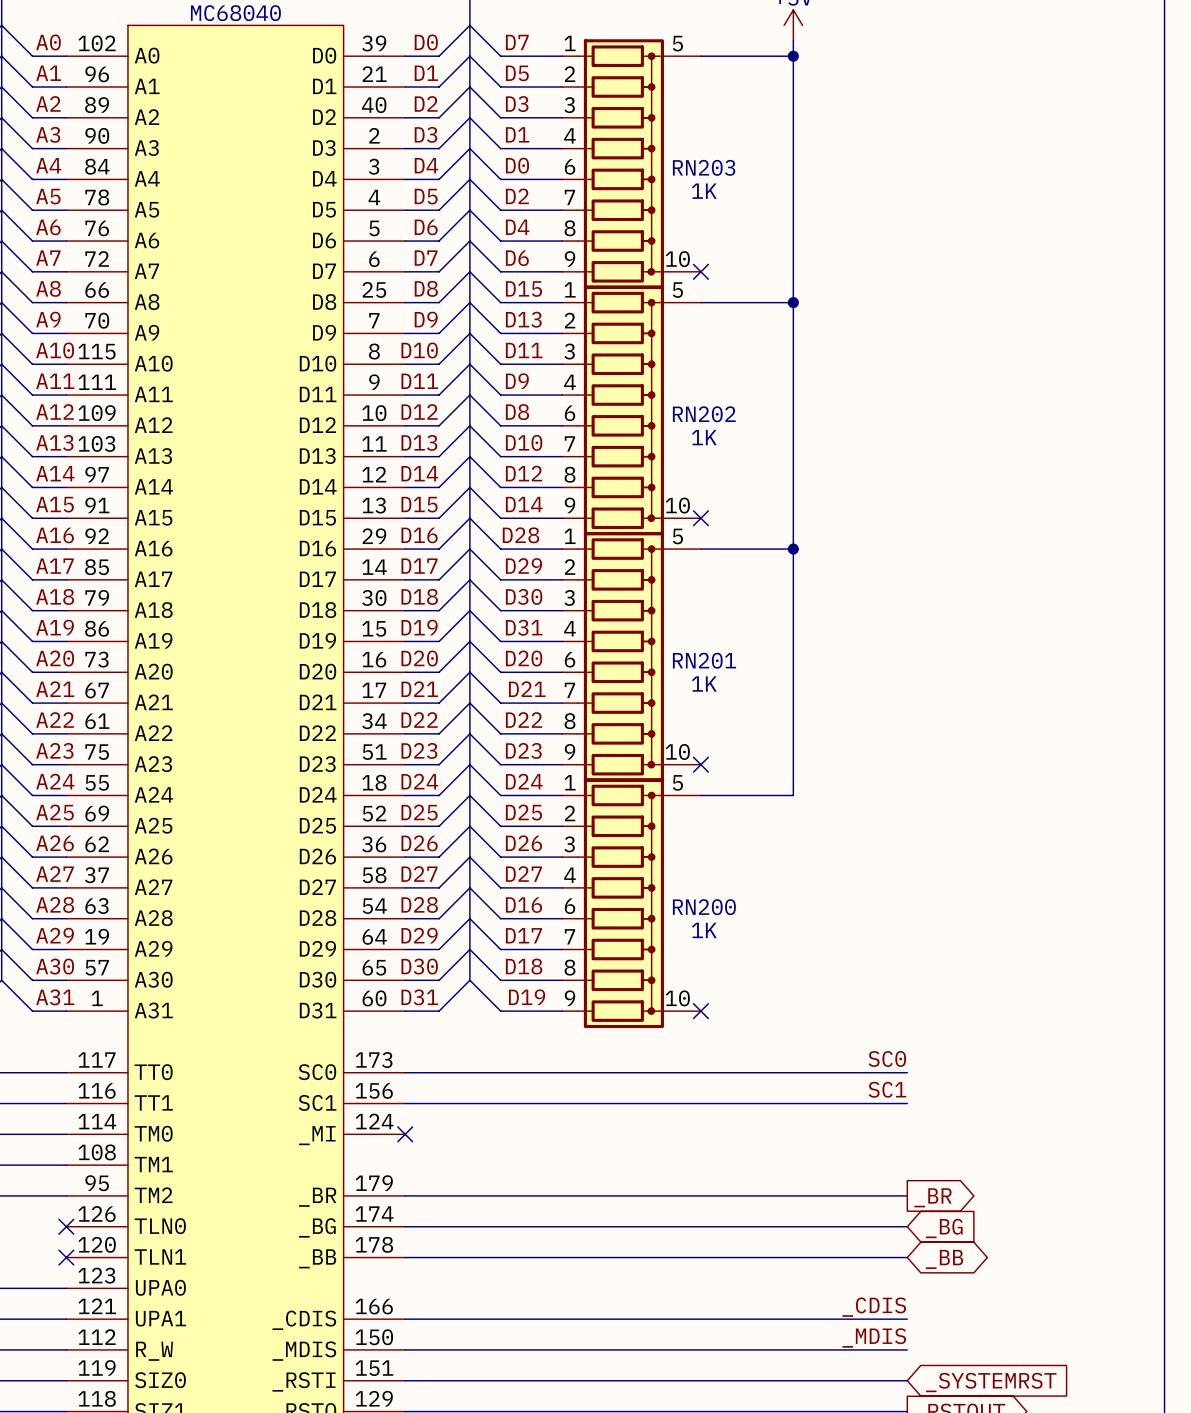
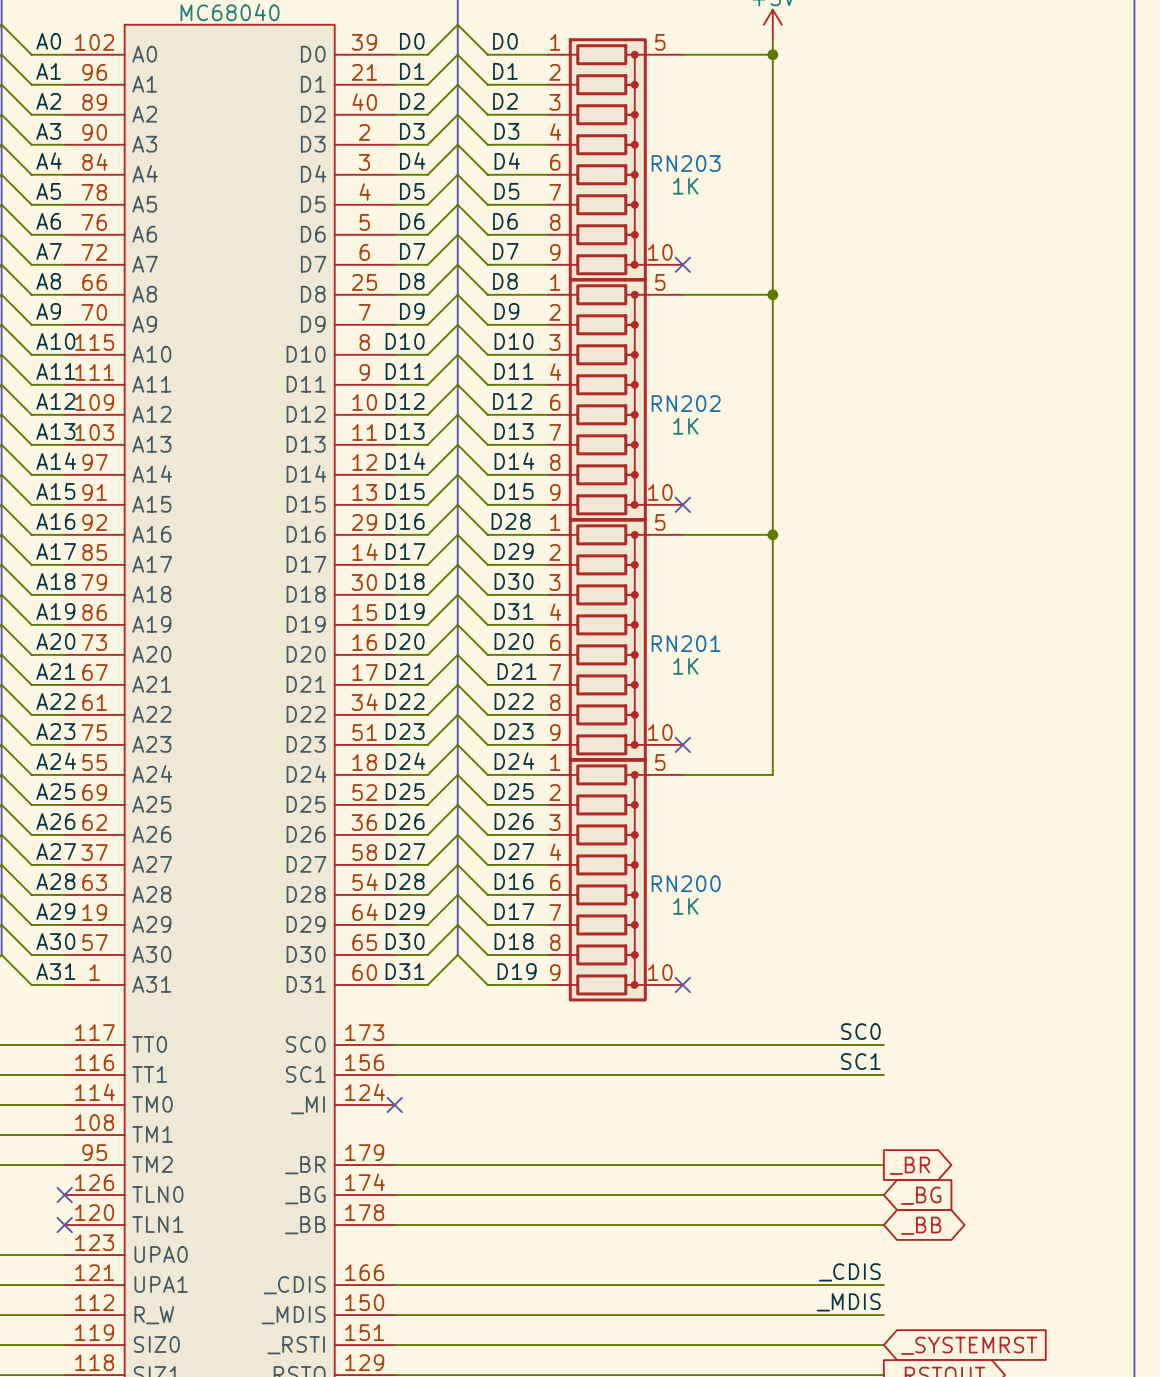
label: none -> D0 (505, 41)
label position: D7 (517, 42) -> D7 (505, 251)
label: D5 (517, 73) -> D1 (505, 71)
label: D3 (517, 104) -> D2 (505, 101)
label: D1 (517, 134) -> D3 (506, 131)
label: D0 (517, 165) -> D4 (507, 161)
label: D2 (517, 196) -> D5 (506, 191)
label: D4 (517, 227) -> none
label position: D6 (517, 258) -> D6 (505, 221)
label: D15 (523, 289) -> none
label: D13 (523, 319) -> D9 (506, 311)
label: D11 (524, 350) -> D10 (514, 341)
label: D9 (517, 381) -> D11 (514, 371)
label: none -> D12 (512, 401)
label position: D8 (517, 412) -> D8 (505, 281)
label: D10 (524, 442) -> D13 (514, 431)
label: D12 (524, 473) -> D14 (514, 461)
label: D14 (524, 504) -> D15 (514, 491)

